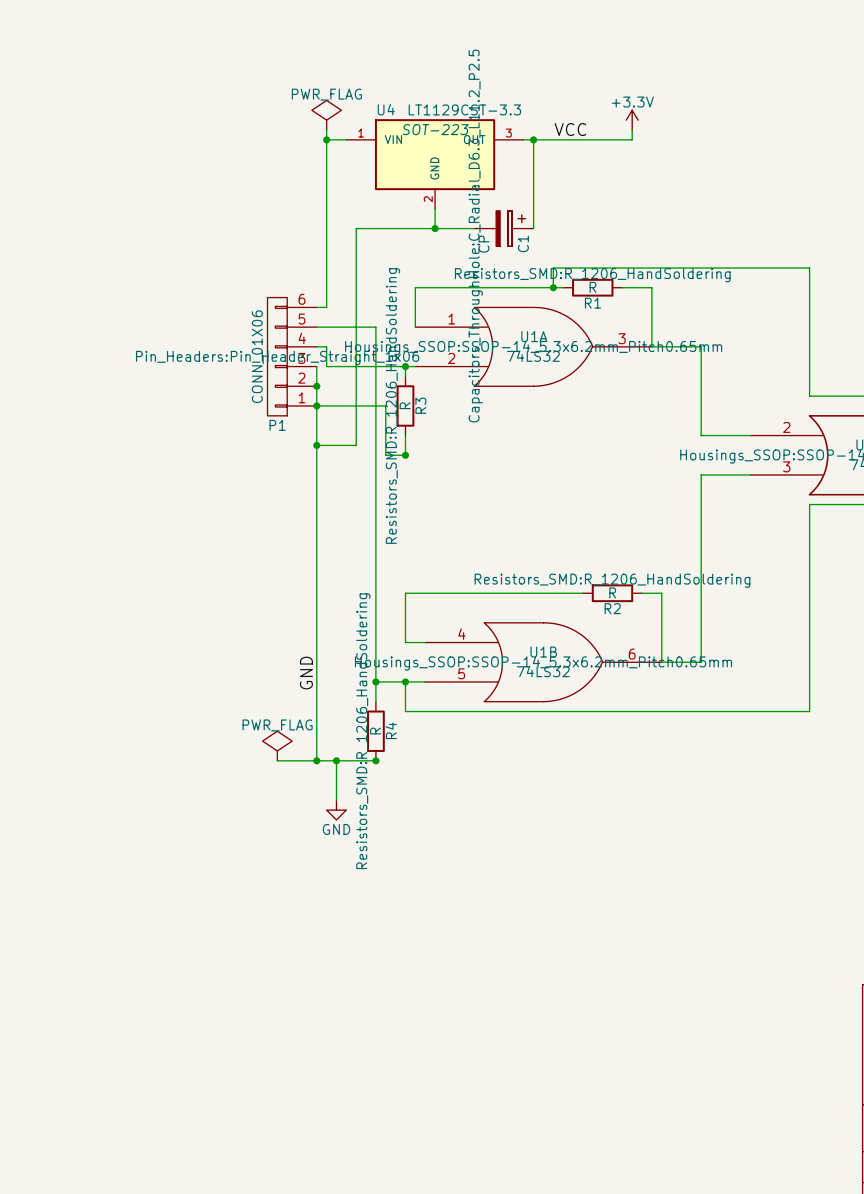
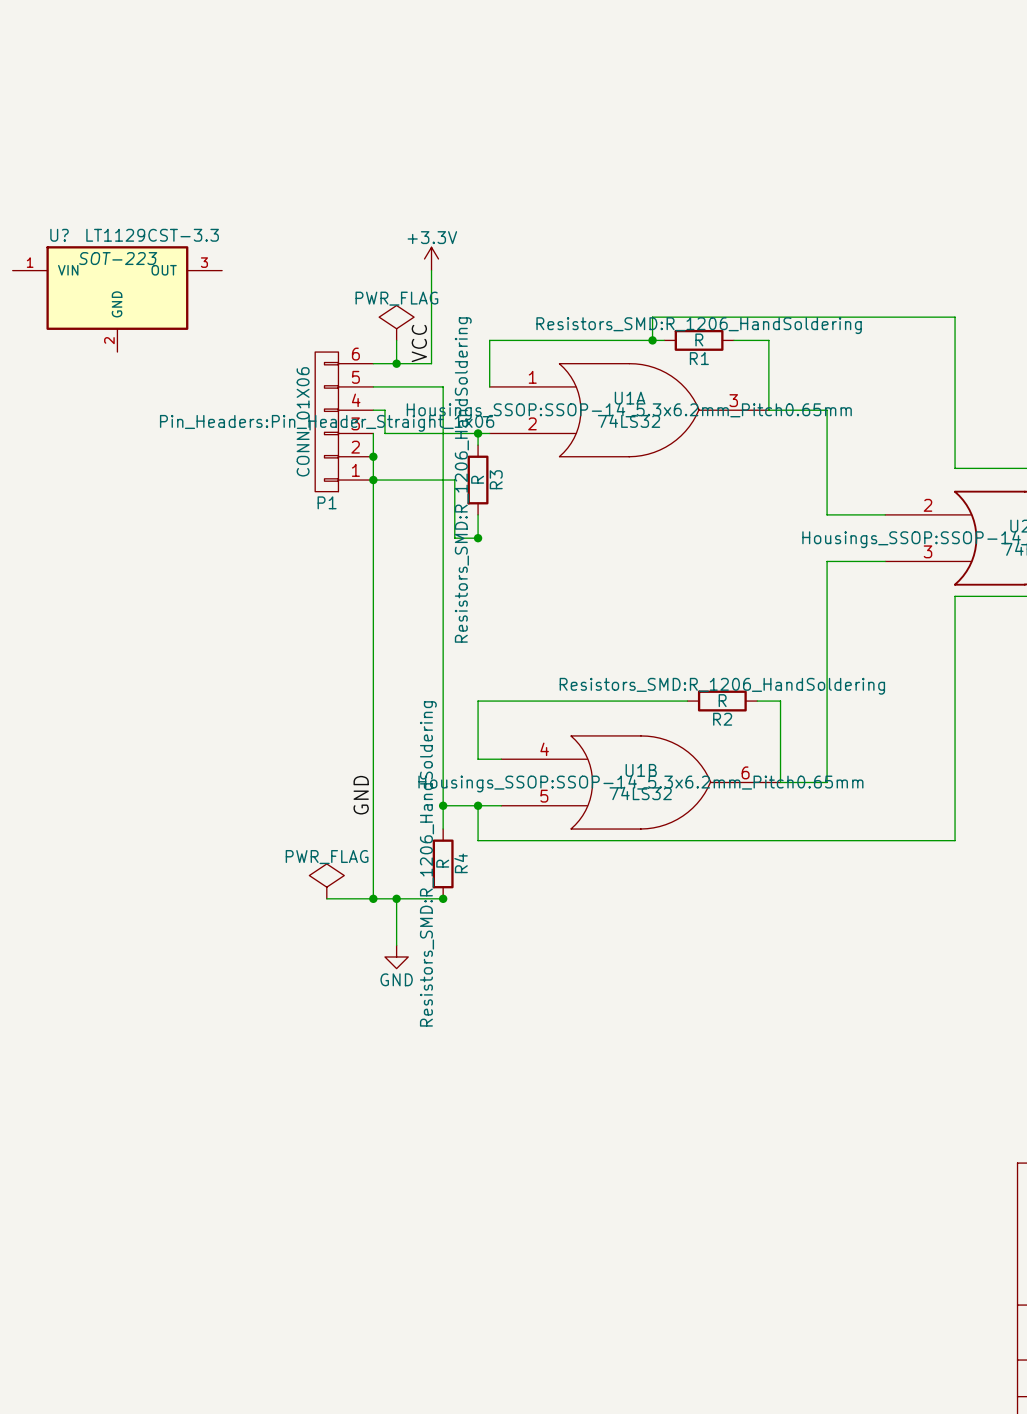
power symbol position: PWR_FLAG (326, 115) -> PWR_FLAG (396, 322)
power symbol: +3.3V (632, 120) -> none
label: VCC (570, 129) -> none
wire: (326, 130) (326, 307) -> (431, 270) (431, 363) (384, 363)
wire: (632, 130) (632, 139) (523, 139) -> none
wire: (326, 139) (346, 139) -> none
junction: (326, 139) -> none
wire: (533, 139) (533, 228) -> none
junction: (533, 139) -> none
U4: LT1129CST-3.3 (435, 164) -> none
wire: (435, 208) (435, 228) -> (396, 340) (396, 363)
power symbol: none -> +3.3V (431, 258)
junction: (435, 228) -> none
wire: (474, 228) (356, 228) (356, 445) (316, 445) -> none
C1: CP (504, 228) -> none
U?: none -> LT1129CST-3.3 (117, 299)
label: none -> VCC (419, 343)
junction: none -> (396, 363)
junction: (316, 445) -> none

